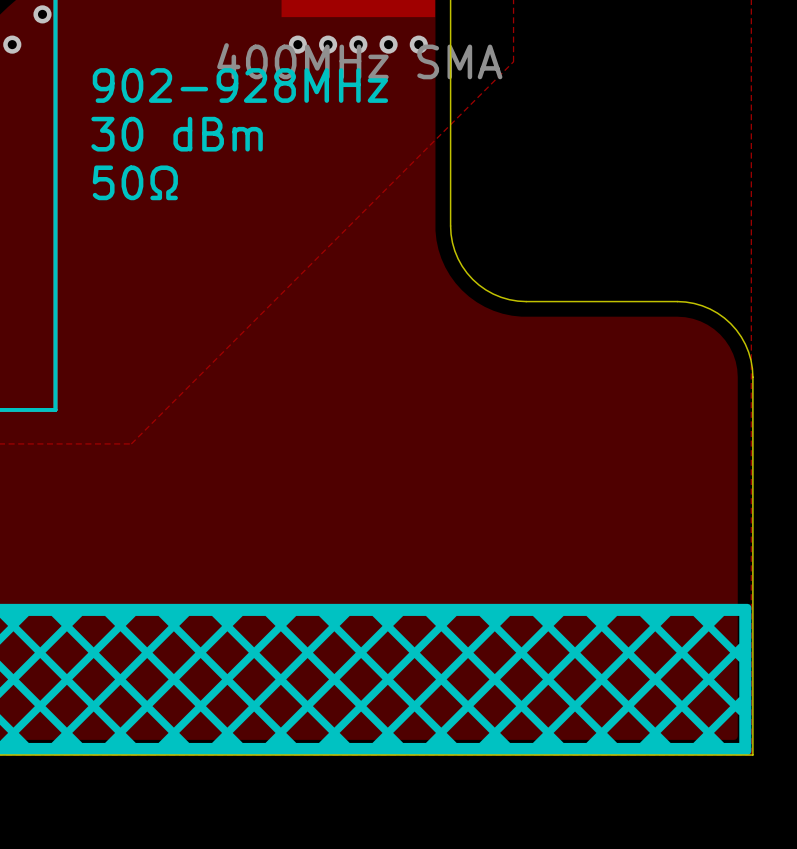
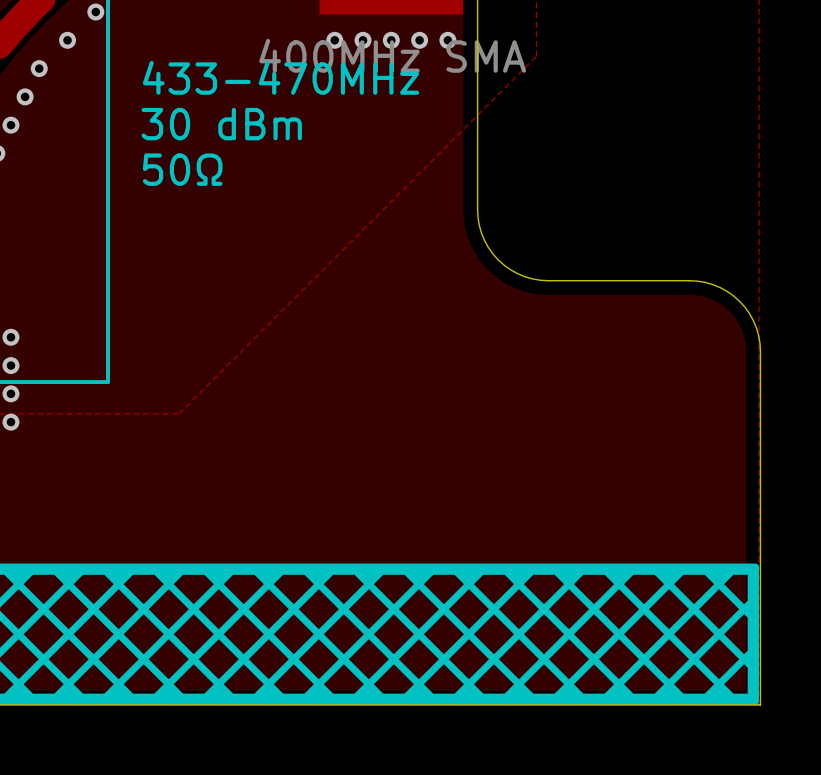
text: 902-928MHz (240, 85) -> 433-470MHz (280, 77)

